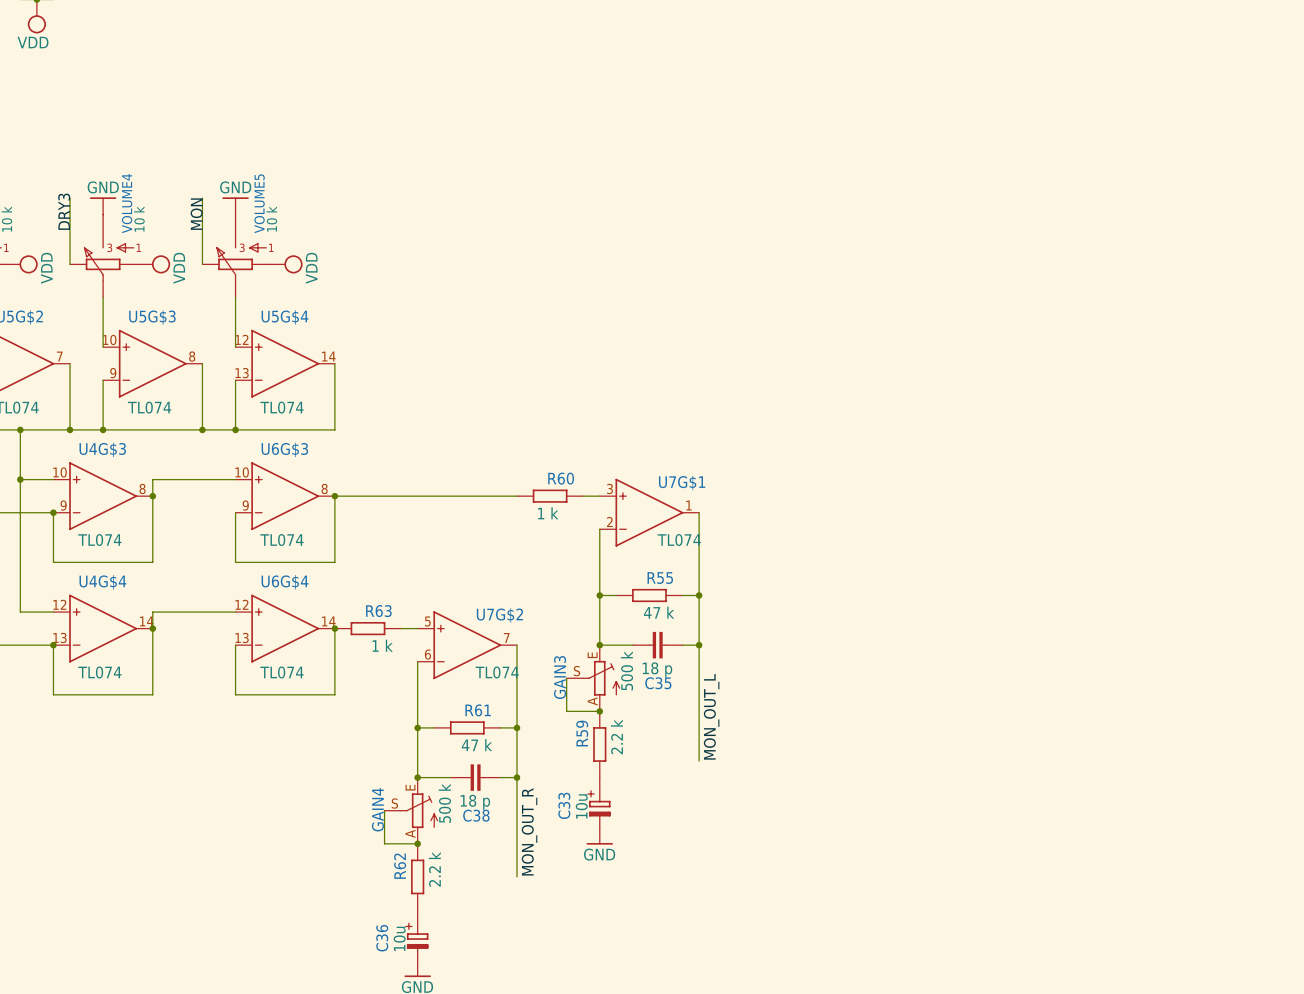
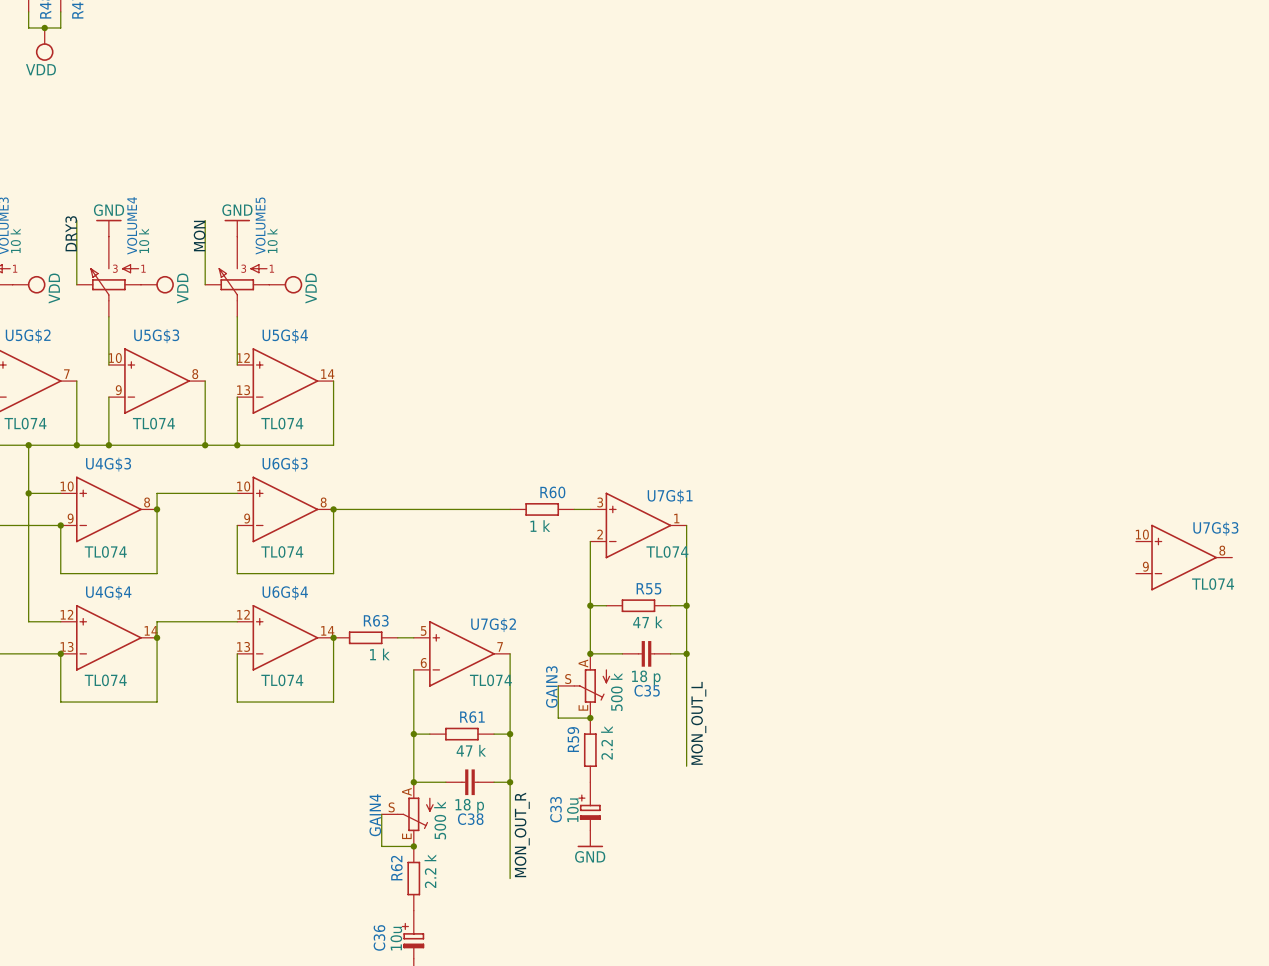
U7G$3: none -> TL074 (1184, 557)
GAIN3 flip: as is (601, 678) -> up-down (591, 685)
GAIN4 flip: as is (419, 810) -> up-down (415, 814)

